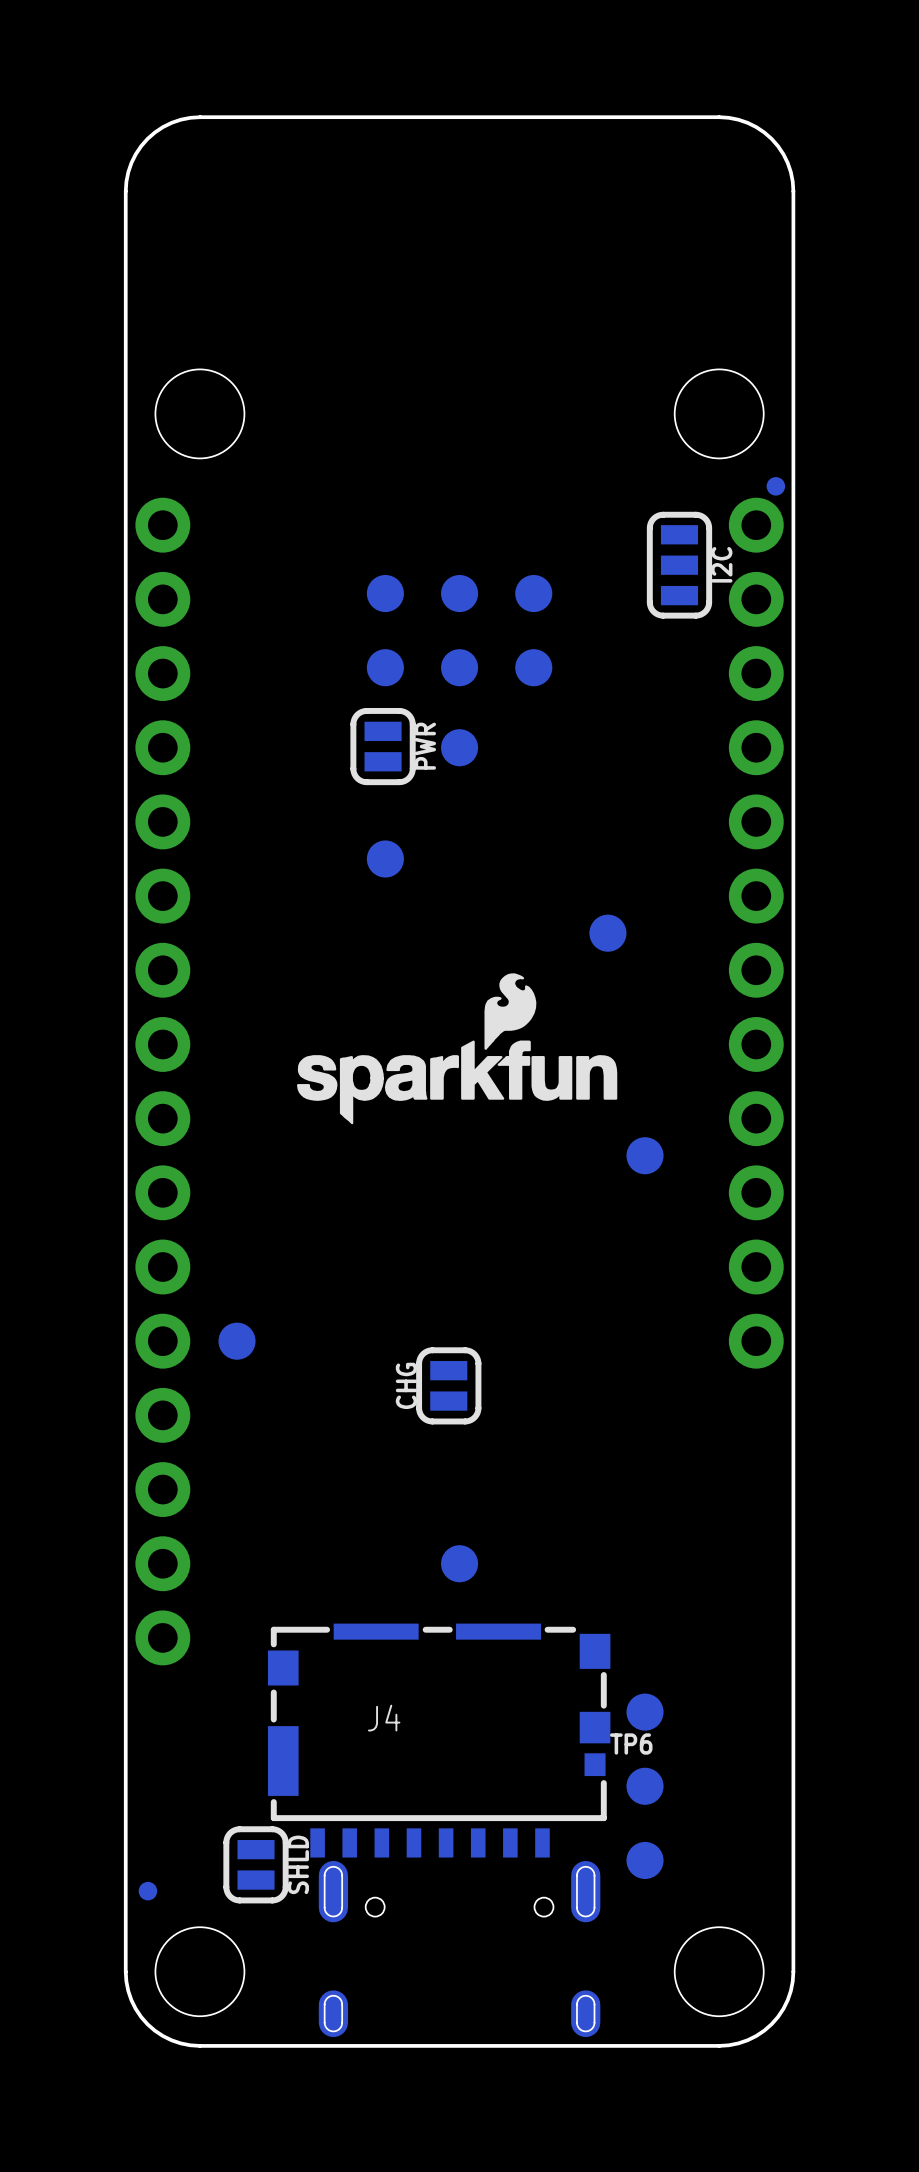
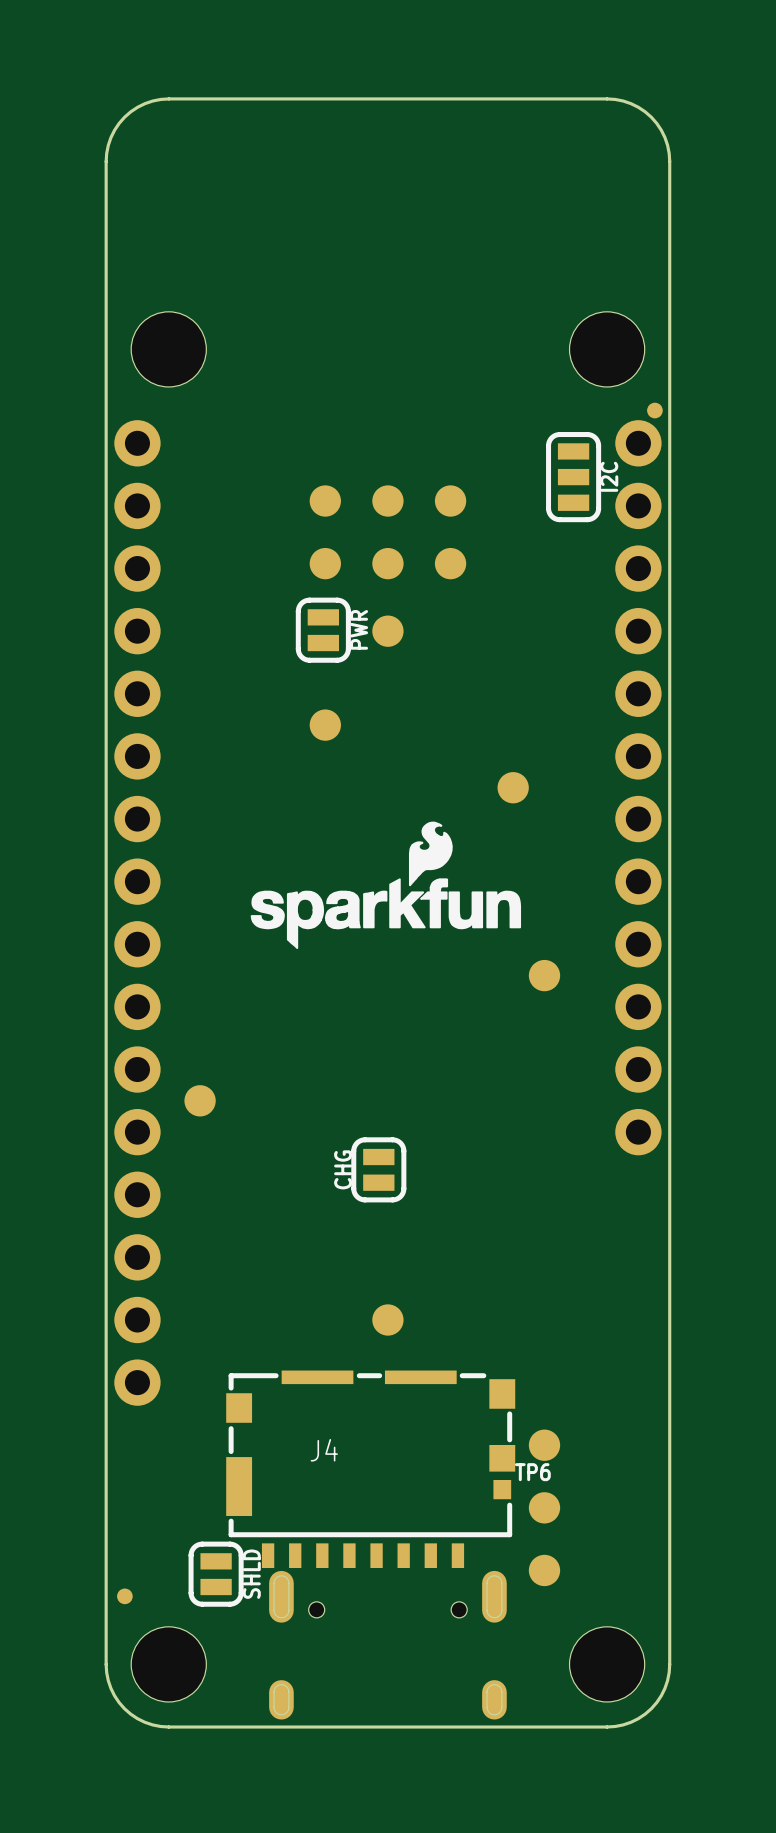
part position: (237, 1341) -> (200, 1100)

